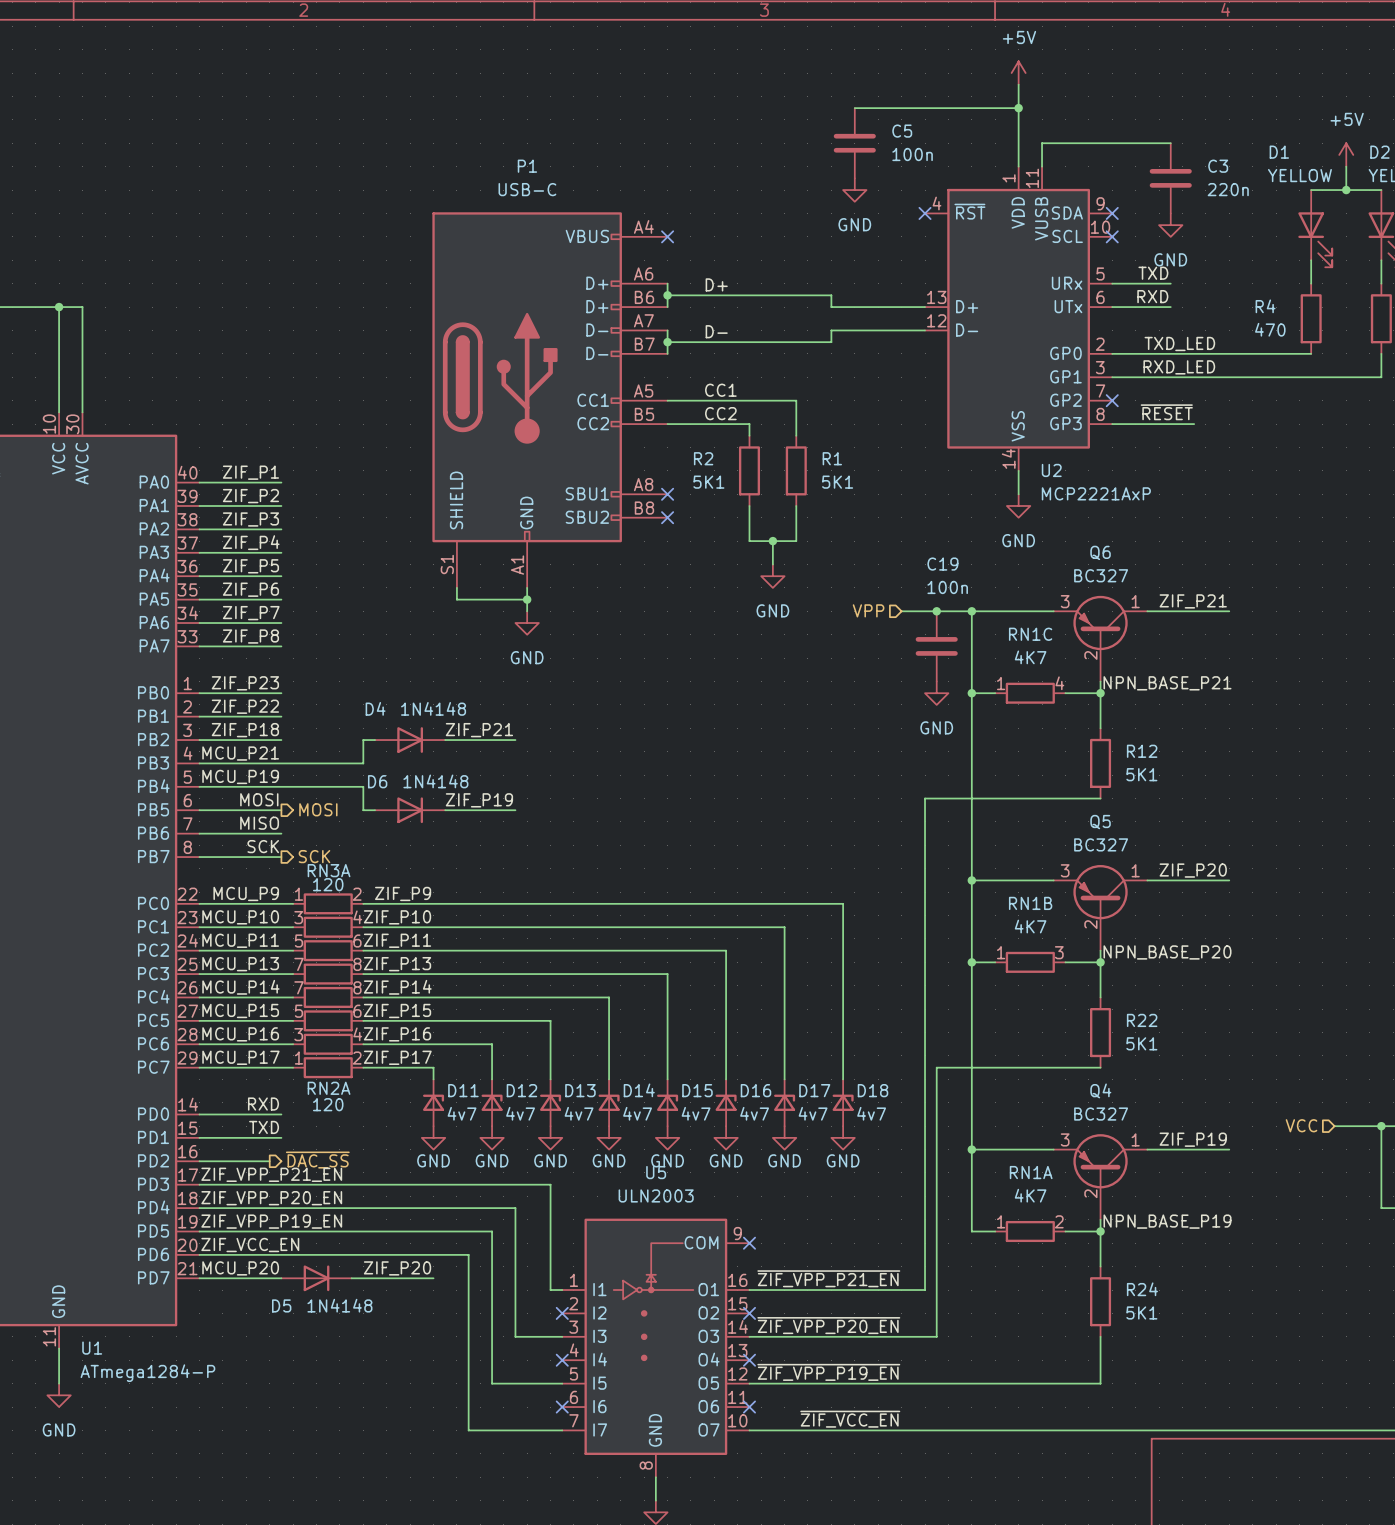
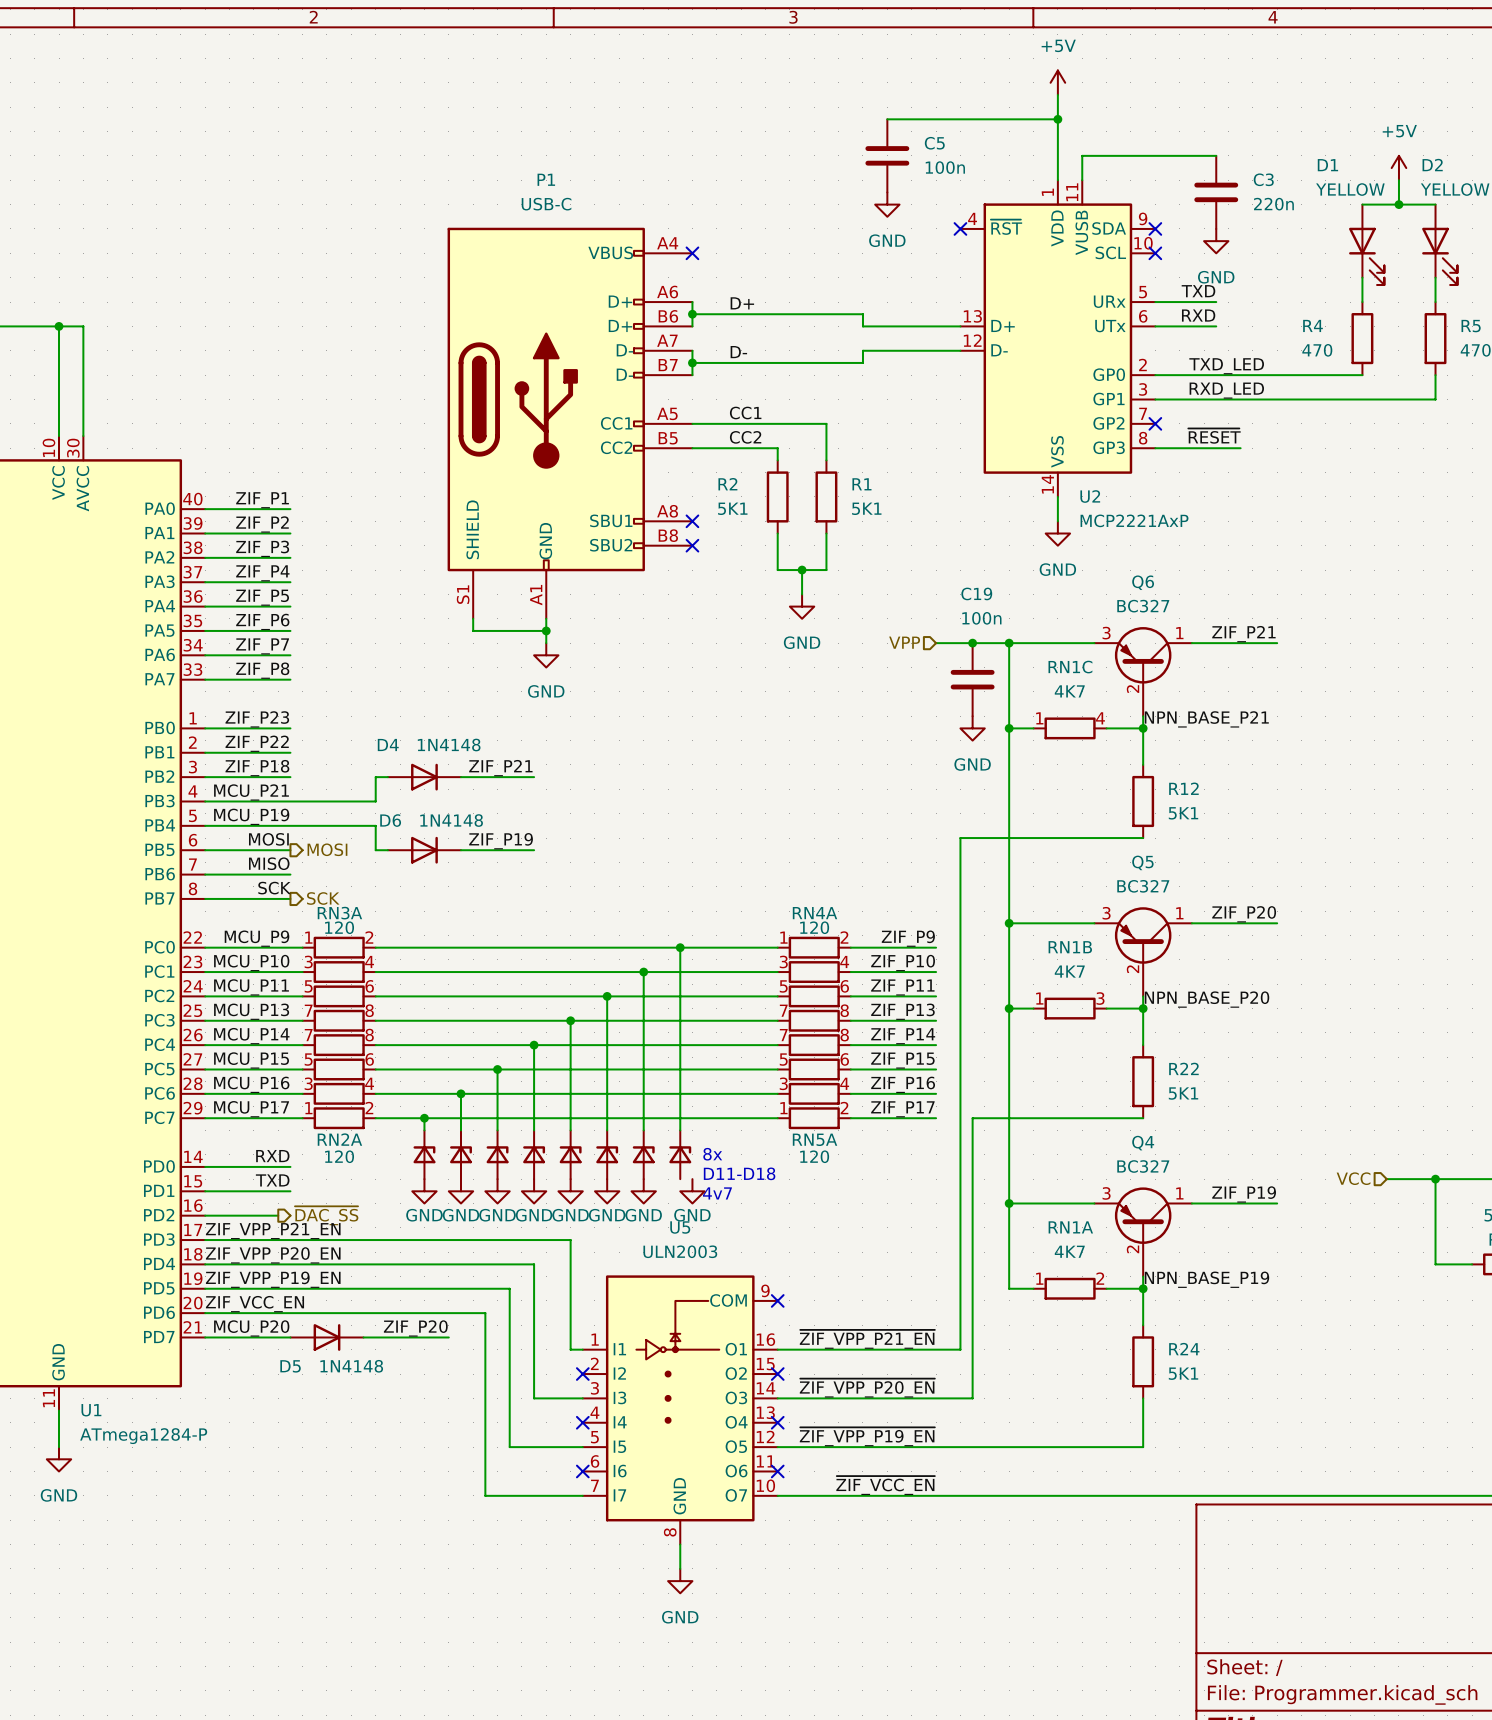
label: ZIF_P9 (403, 893) -> none
label: none -> ZIF_P9 (908, 938)
wire: none -> (680, 947) (680, 1130)
junction: none -> (680, 947)
wire: (749, 903) (819, 903) -> none
RN4A: none -> 120 (814, 947)
wire: (843, 903) (843, 1079) -> (875, 947) (936, 947)
label: ZIF_P10 (397, 917) -> none
label: none -> ZIF_P10 (903, 963)
wire: none -> (643, 972) (643, 1130)
junction: none -> (643, 972)
wire: (749, 927) (784, 927) (784, 1079) -> none
part: none -> (814, 972)
wire: none -> (850, 972) (936, 972)
label: ZIF_P11 (397, 940) -> none
label: none -> ZIF_P11 (902, 987)
wire: none -> (607, 996) (607, 1130)
junction: none -> (607, 996)
wire: (726, 950) (726, 1079) -> (753, 996) (777, 996)
part: none -> (814, 996)
wire: none -> (850, 996) (936, 996)
label: ZIF_P13 (397, 964) -> none
label: none -> ZIF_P13 (902, 1011)
wire: none -> (570, 1020) (570, 1069) (777, 1069)
junction: none -> (570, 1020)
wire: (667, 974) (667, 1079) -> (692, 1020) (777, 1020)
part: none -> (814, 1020)
wire: none -> (850, 1020) (936, 1020)
label: ZIF_P14 (397, 987) -> none
label: none -> ZIF_P14 (903, 1036)
wire: none -> (534, 1045) (534, 1130)
junction: none -> (534, 1045)
wire: (609, 997) (609, 1079) -> (631, 1045) (777, 1045)
part: none -> (814, 1045)
wire: none -> (850, 1045) (936, 1045)
label: ZIF_P15 (397, 1010) -> none
label: none -> ZIF_P15 (902, 1060)
wire: none -> (497, 1069) (497, 1130)
junction: none -> (497, 1069)
part: none -> (814, 1069)
wire: none -> (850, 1069) (936, 1069)
label: ZIF_P16 (397, 1034) -> none
label: none -> ZIF_P16 (903, 1084)
wire: none -> (460, 1093) (460, 1130)
junction: none -> (460, 1093)
wire: (492, 1044) (492, 1079) -> (509, 1093) (777, 1093)
part: none -> (814, 1093)
wire: none -> (850, 1093) (936, 1093)
label: ZIF_P17 (397, 1057) -> none
label: none -> ZIF_P17 (902, 1109)
wire: none -> (424, 1118) (424, 1130)
junction: none -> (424, 1118)
wire: (433, 1067) (433, 1079) -> (448, 1118) (777, 1118)
RN5A: none -> 120 (814, 1118)
wire: none -> (850, 1118) (936, 1118)
D13 name: D13 (580, 1090) -> none
part: none -> (424, 1154)
D11: 4v7 (433, 1102) -> none
part: none -> (460, 1154)
part: none -> (497, 1154)
D12: 4v7 (492, 1102) -> none
part: none -> (534, 1154)
part: none -> (607, 1154)
D14: 4v7 (609, 1102) -> none
part: none -> (643, 1154)
part: none -> (680, 1154)
D15: 4v7 (667, 1102) -> none
text: none -> 8x (712, 1154)
D16: 4v7 (726, 1102) -> none
D17: 4v7 (784, 1102) -> none
D18: 4v7 (843, 1102) -> none
D13 value: 4v7 (579, 1113) -> none
text: none -> D11-D18 (739, 1173)
power symbol: none -> GND (424, 1191)
power symbol: GND (433, 1137) -> none
power symbol: none -> GND (460, 1191)
power symbol: none -> GND (497, 1191)
power symbol: GND (492, 1137) -> none
power symbol: none -> GND (534, 1191)
power symbol: none -> GND (607, 1191)
power symbol: GND (609, 1137) -> none
power symbol: none -> GND (643, 1191)
power symbol: GND (726, 1137) -> none
power symbol: GND (784, 1137) -> none
power symbol: GND (843, 1137) -> none
text: none -> 4v7 (717, 1193)

